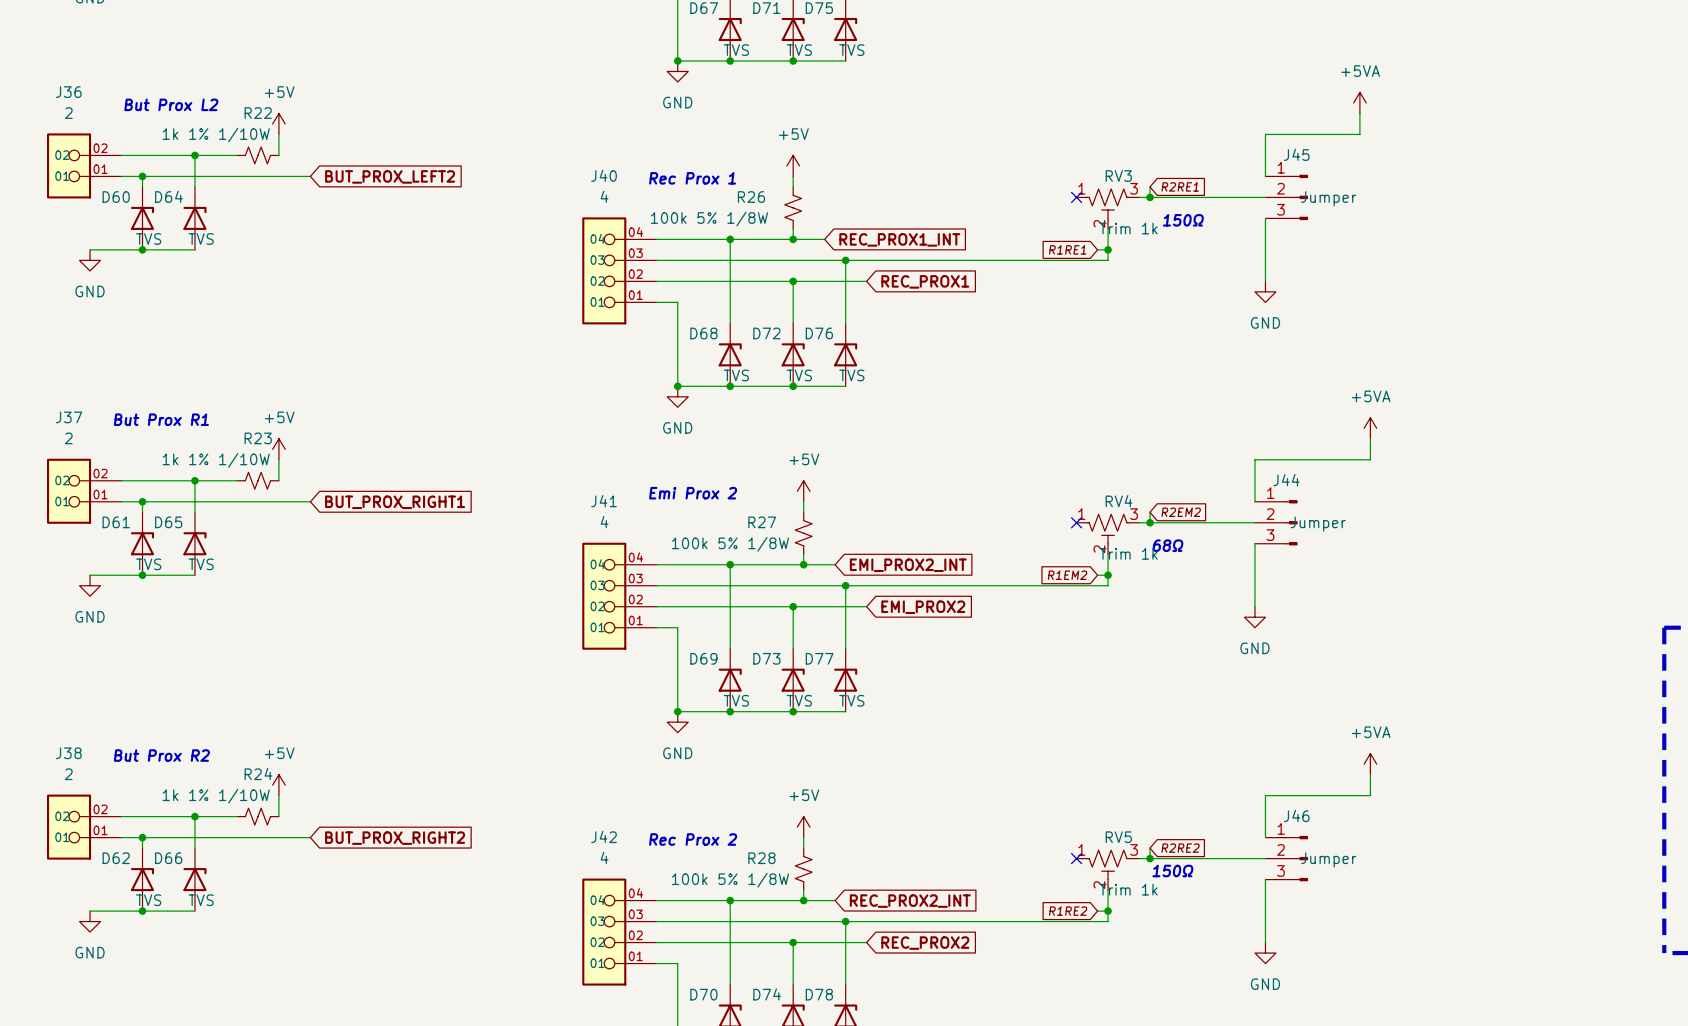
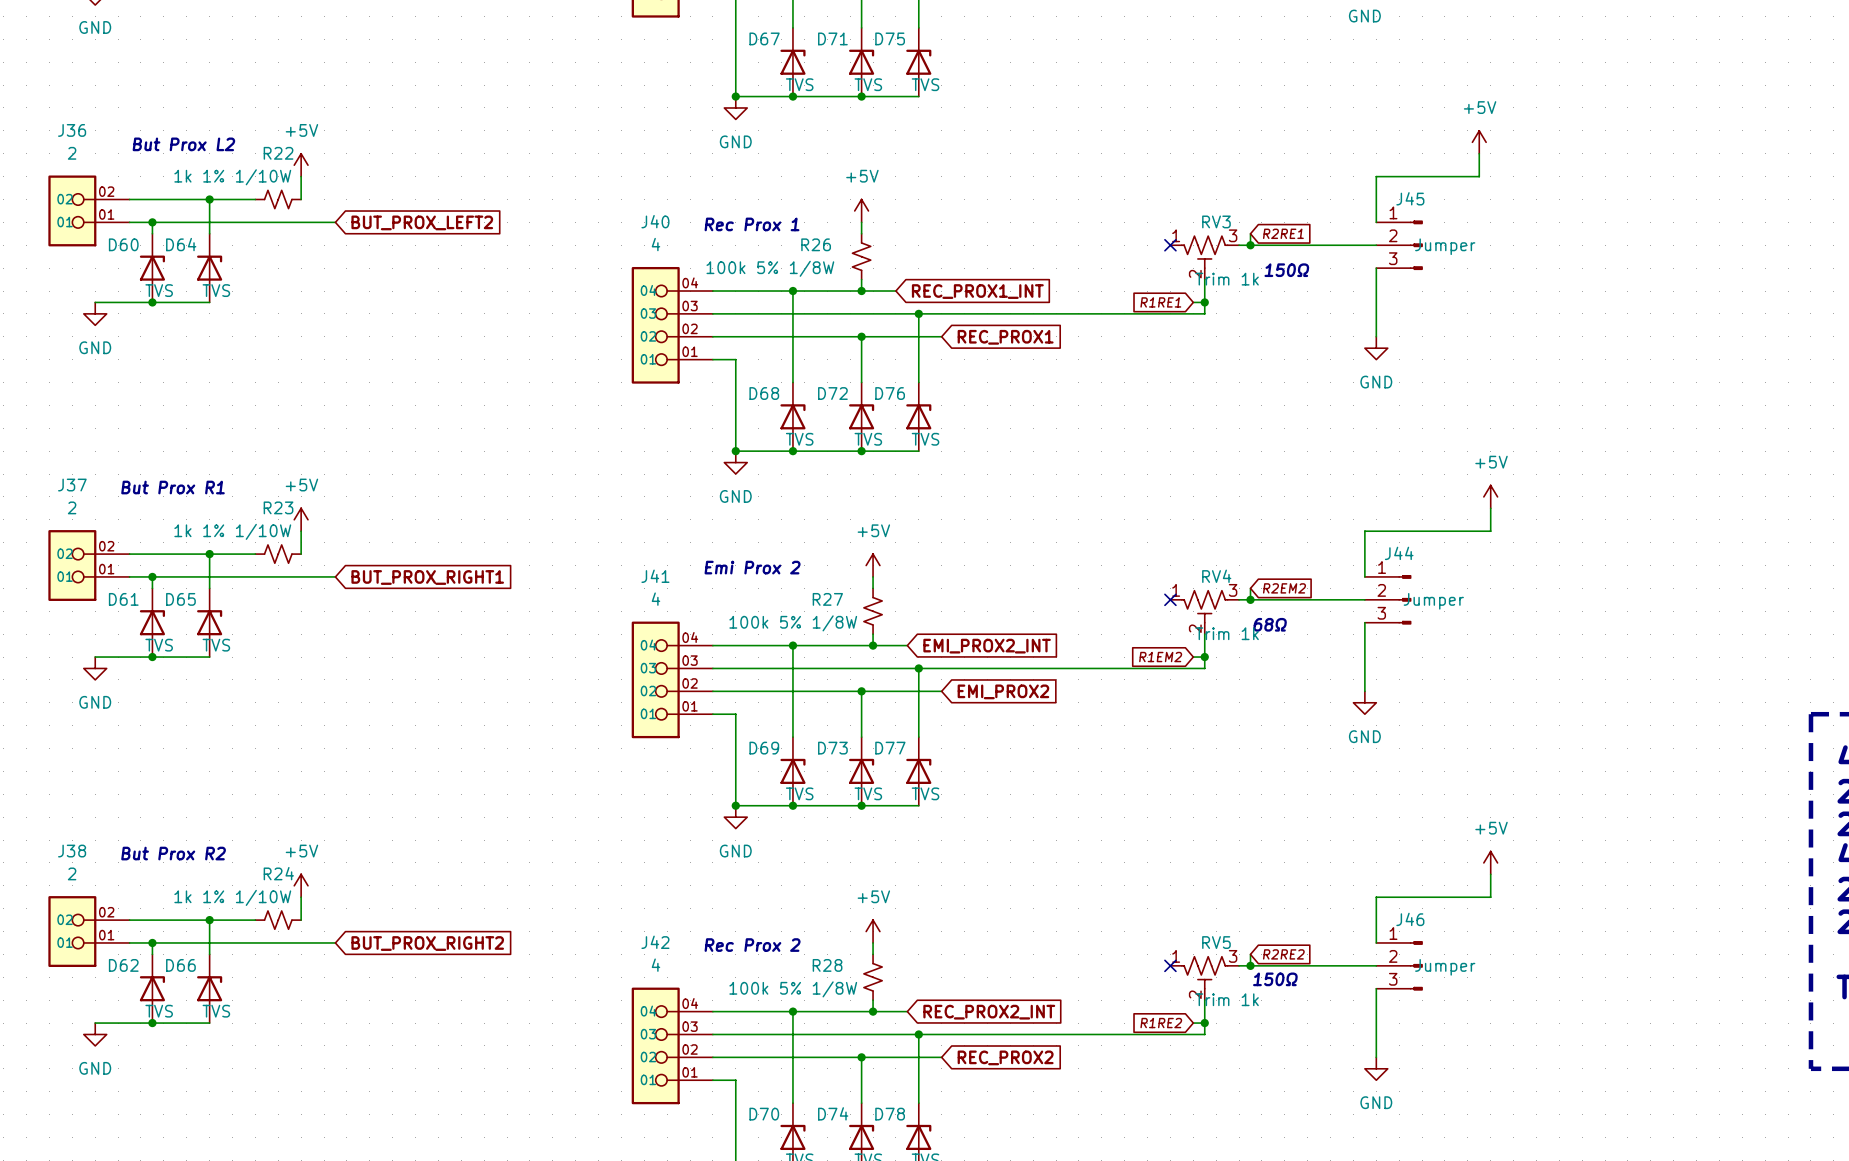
power symbol: +5VA (1359, 102) -> +5V (1479, 142)
power symbol: +5VA (1370, 428) -> +5V (1490, 496)
power symbol: +5VA (1370, 764) -> +5V (1490, 862)

